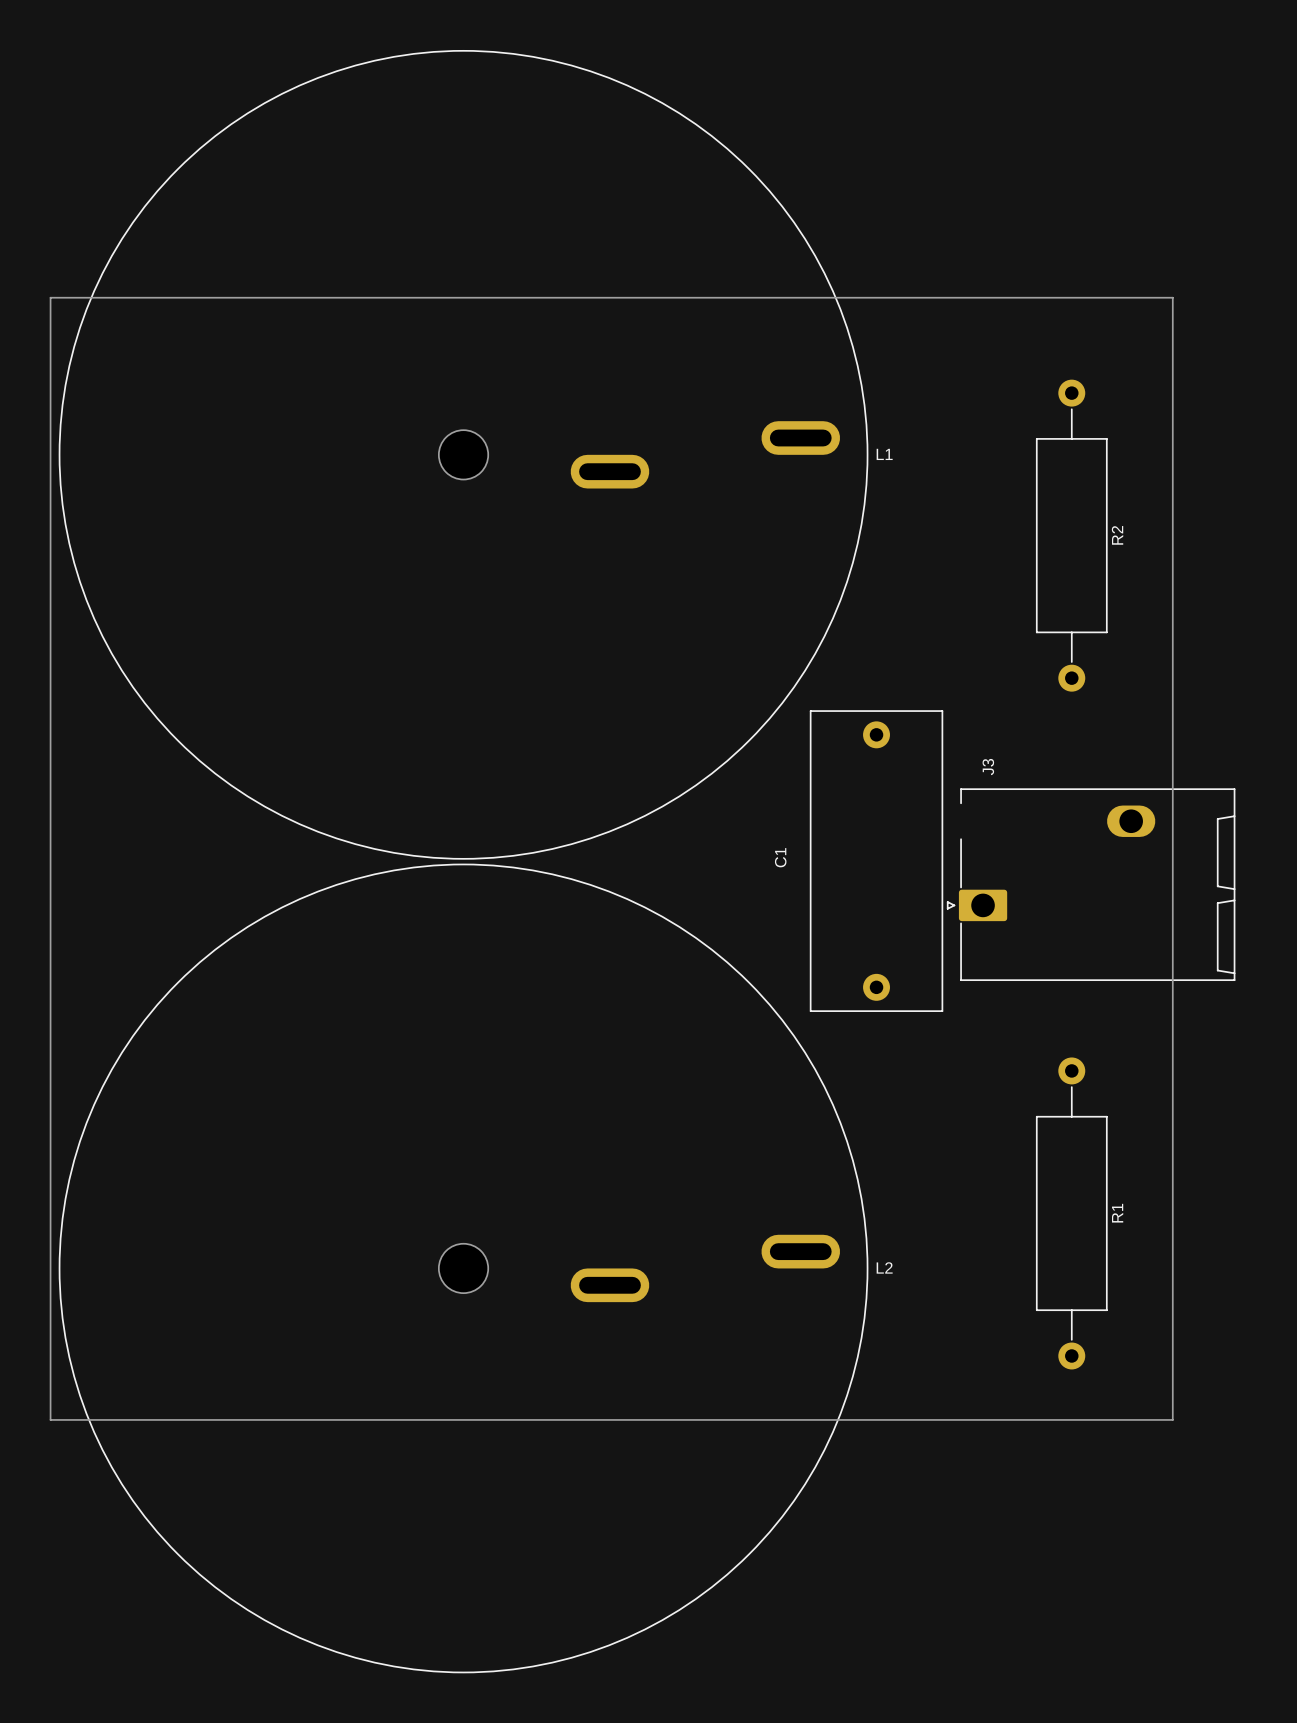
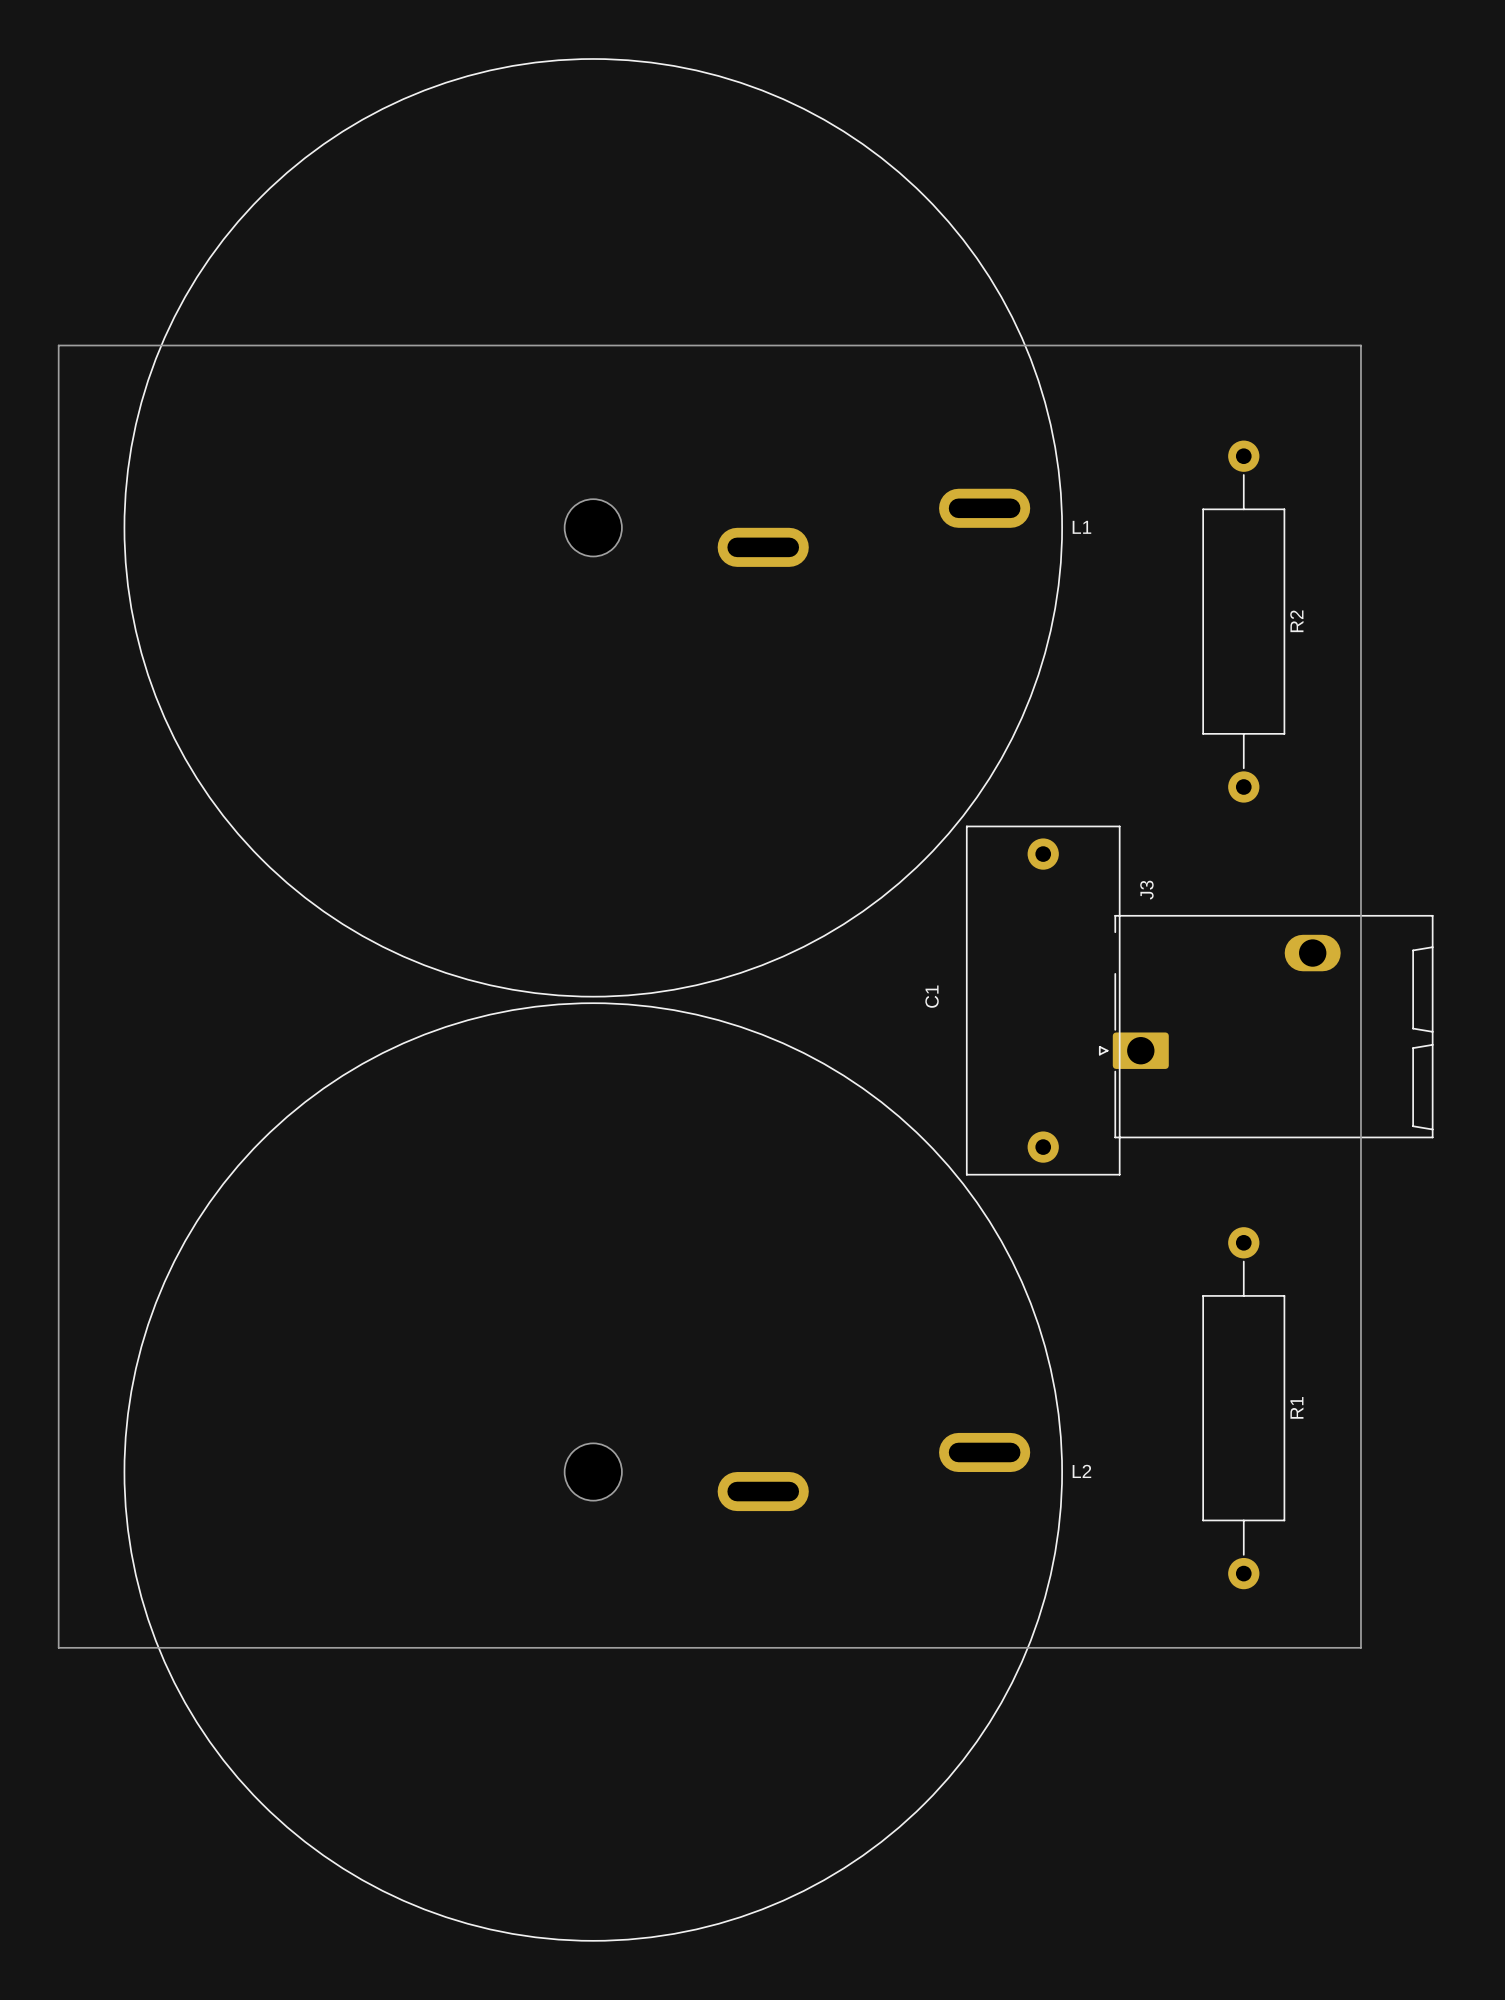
L1 position: (463, 454) -> (593, 527)
C1 position: (876, 861) -> (1043, 1000)
L2 position: (463, 1268) -> (593, 1472)

